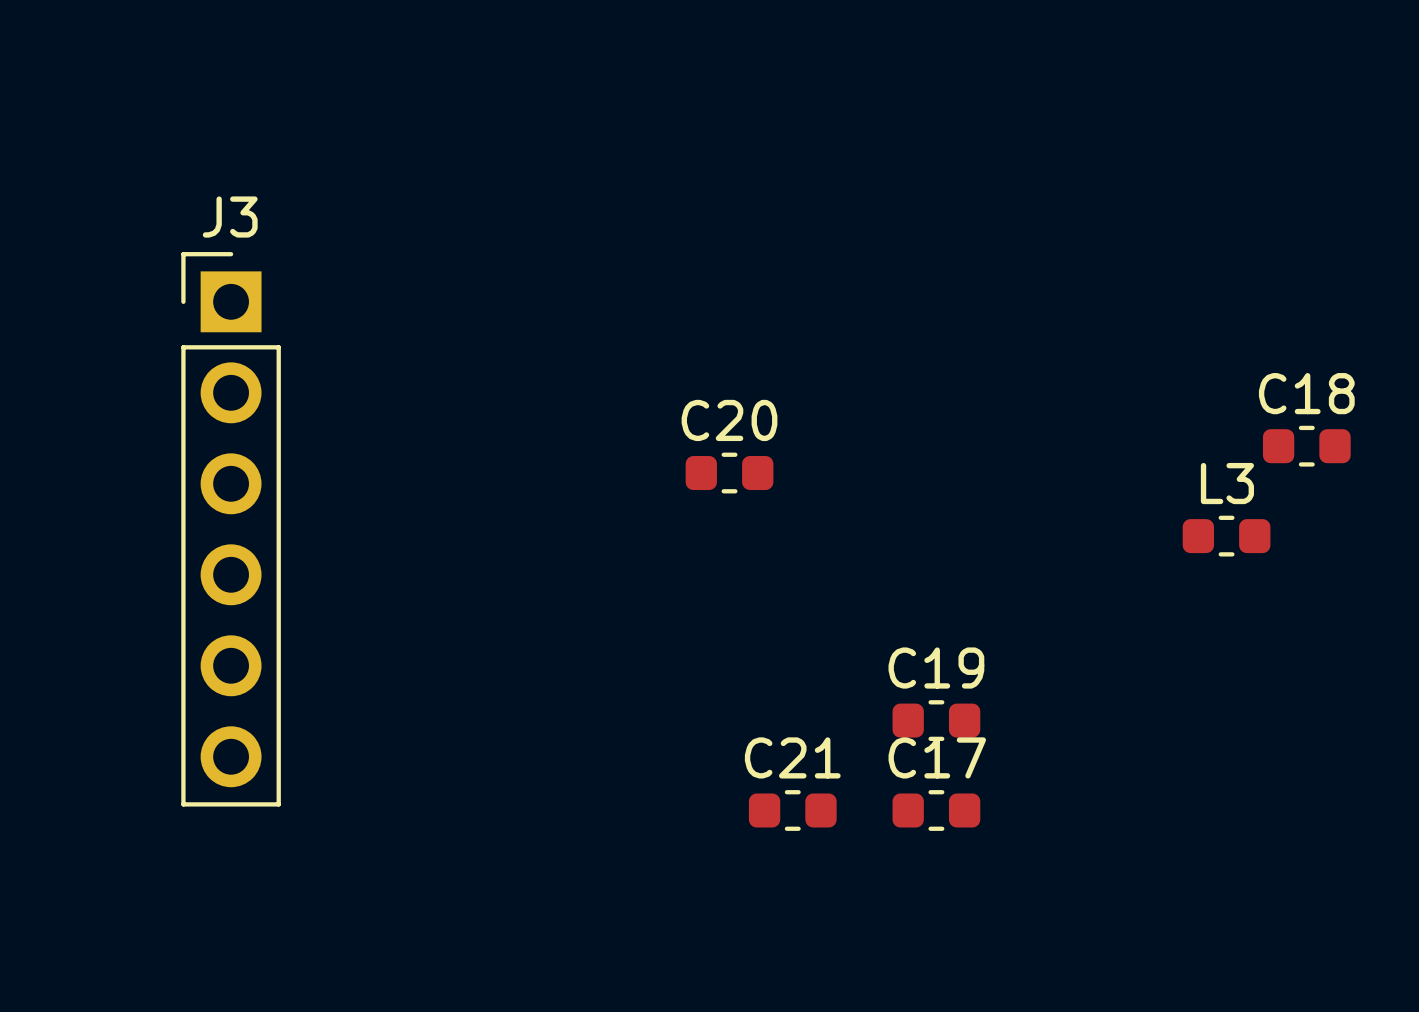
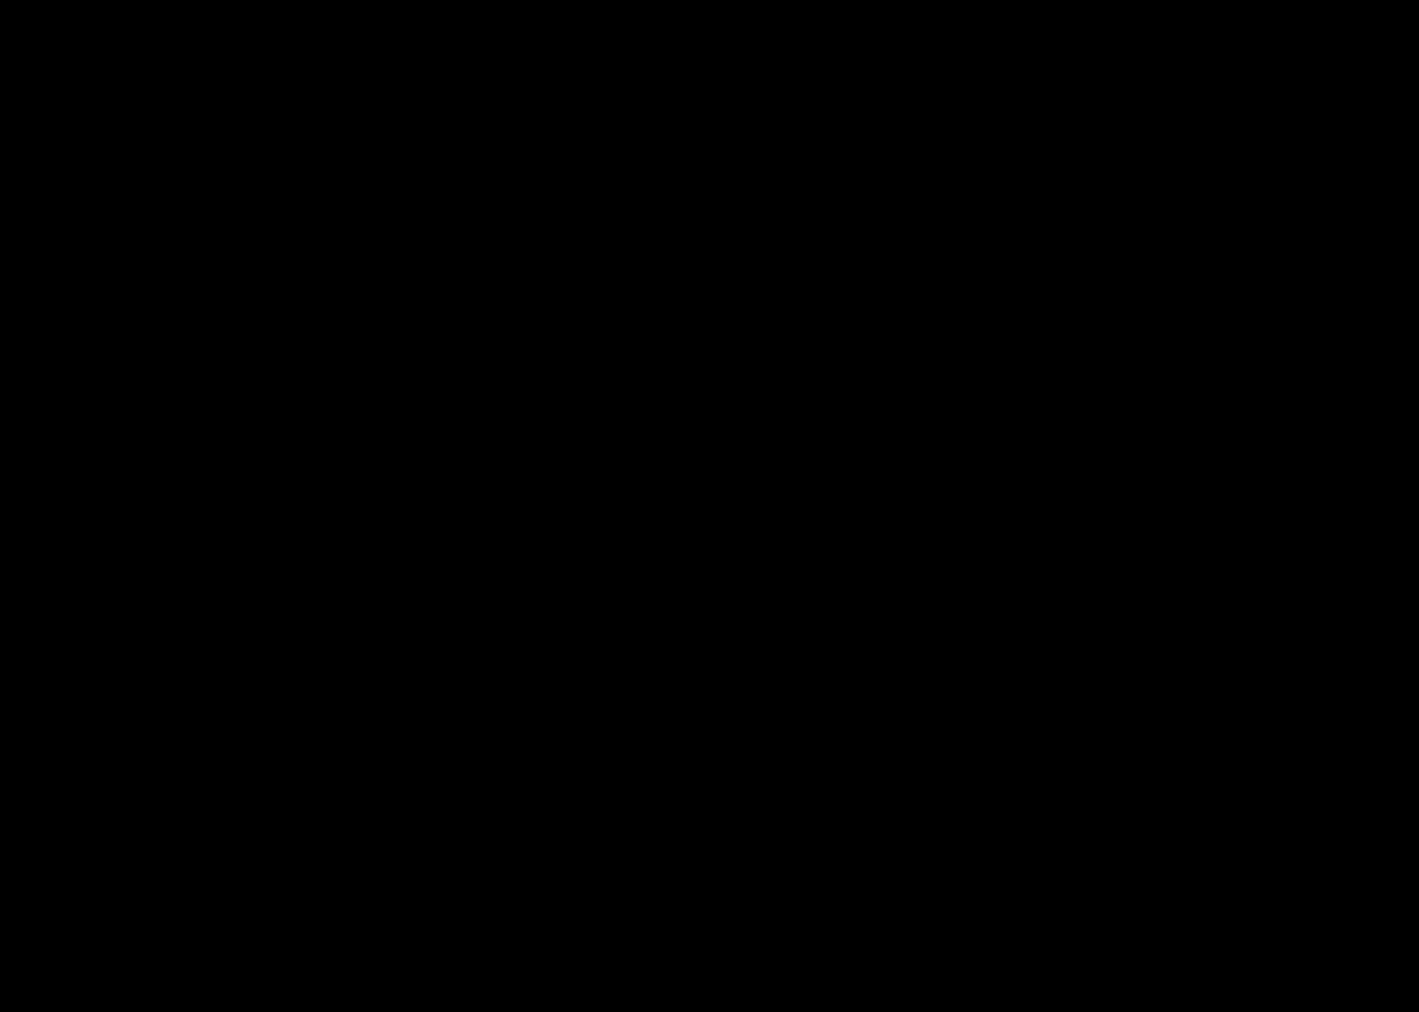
C18: (1306, 446) -> none
C20: (729, 473) -> none
J3: (231, 529) -> none
L3: (1226, 536) -> none
C19: (936, 720) -> none
C21: (792, 810) -> none
C17: (936, 810) -> none

